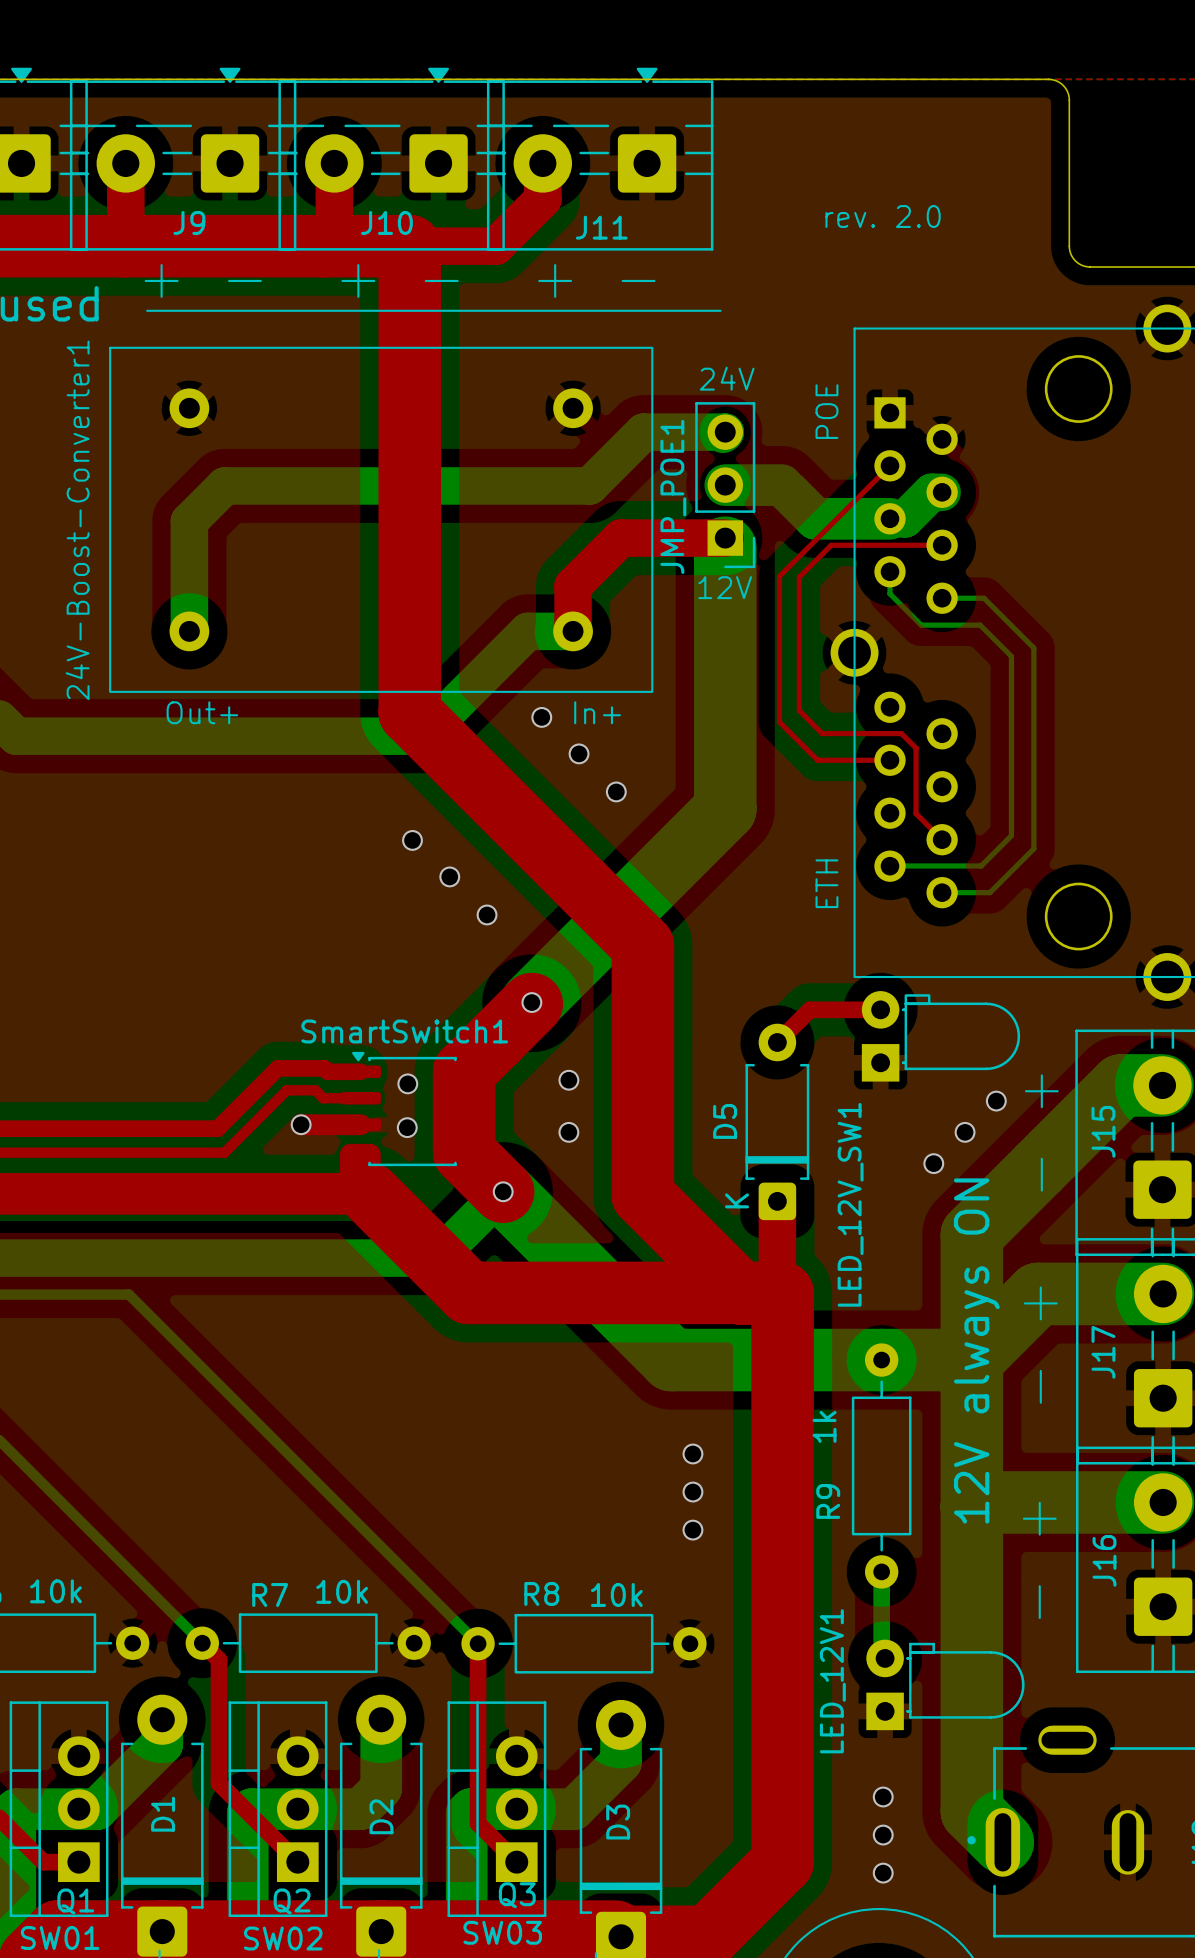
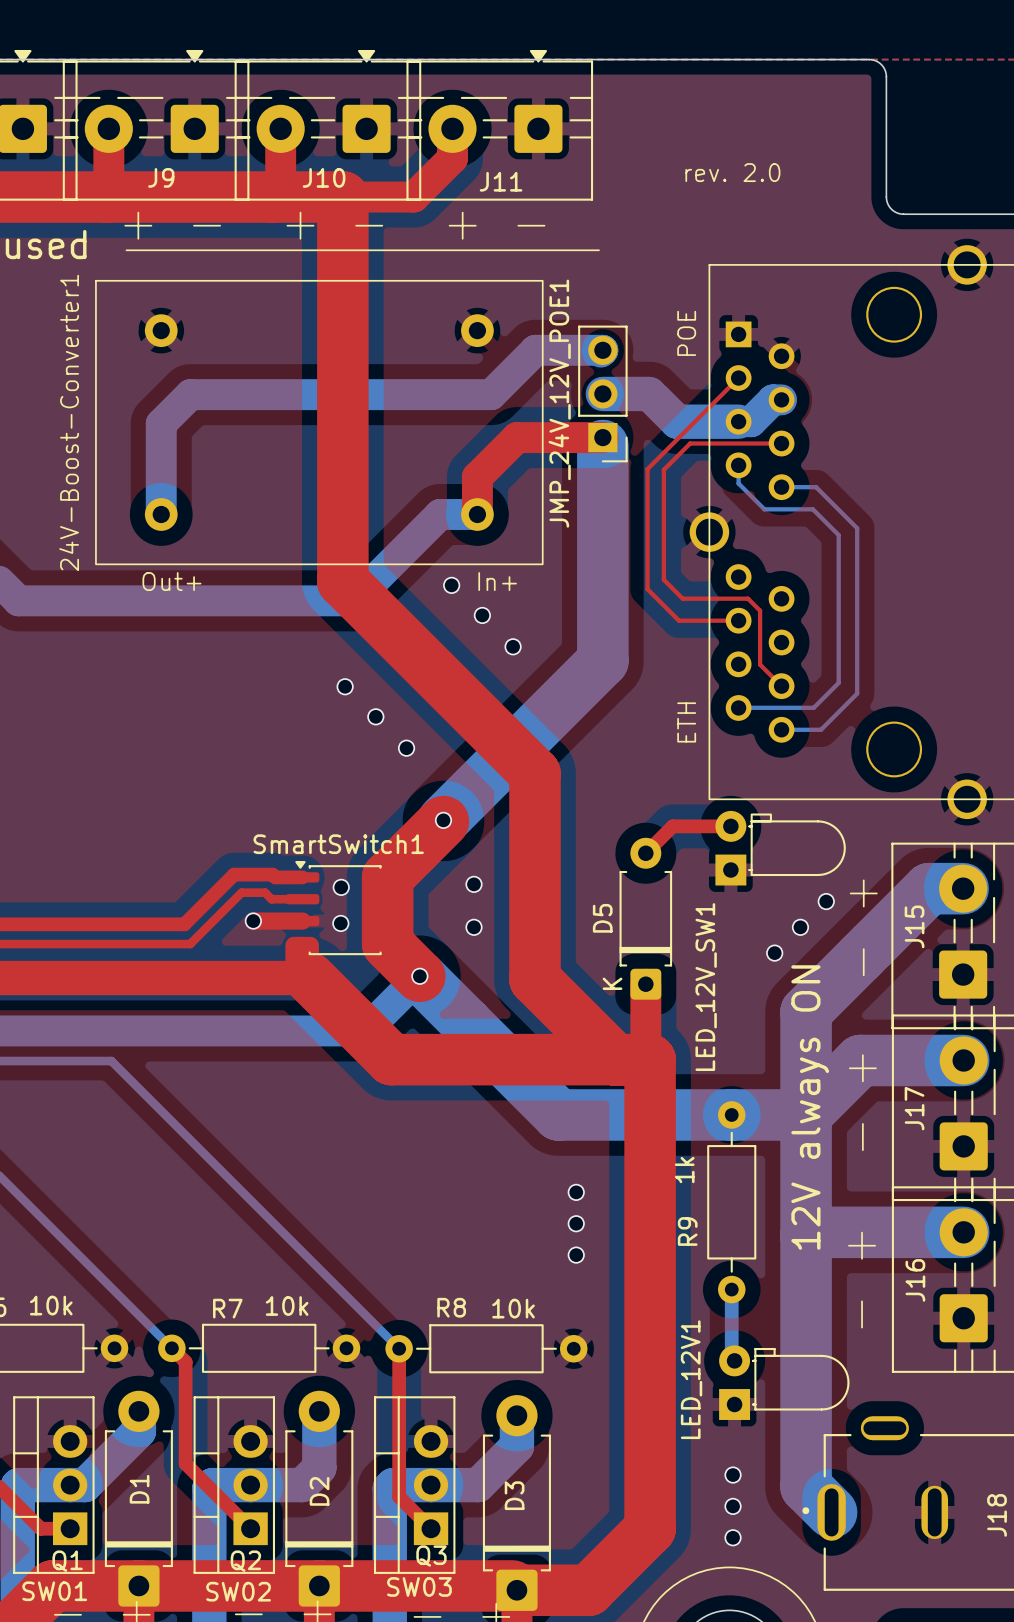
text: 24V (727, 378) -> none
JMP_POE1 name: JMP_POE1 (673, 496) -> JMP_24V_12V_POE1 (559, 403)
text: 12V (725, 587) -> none

